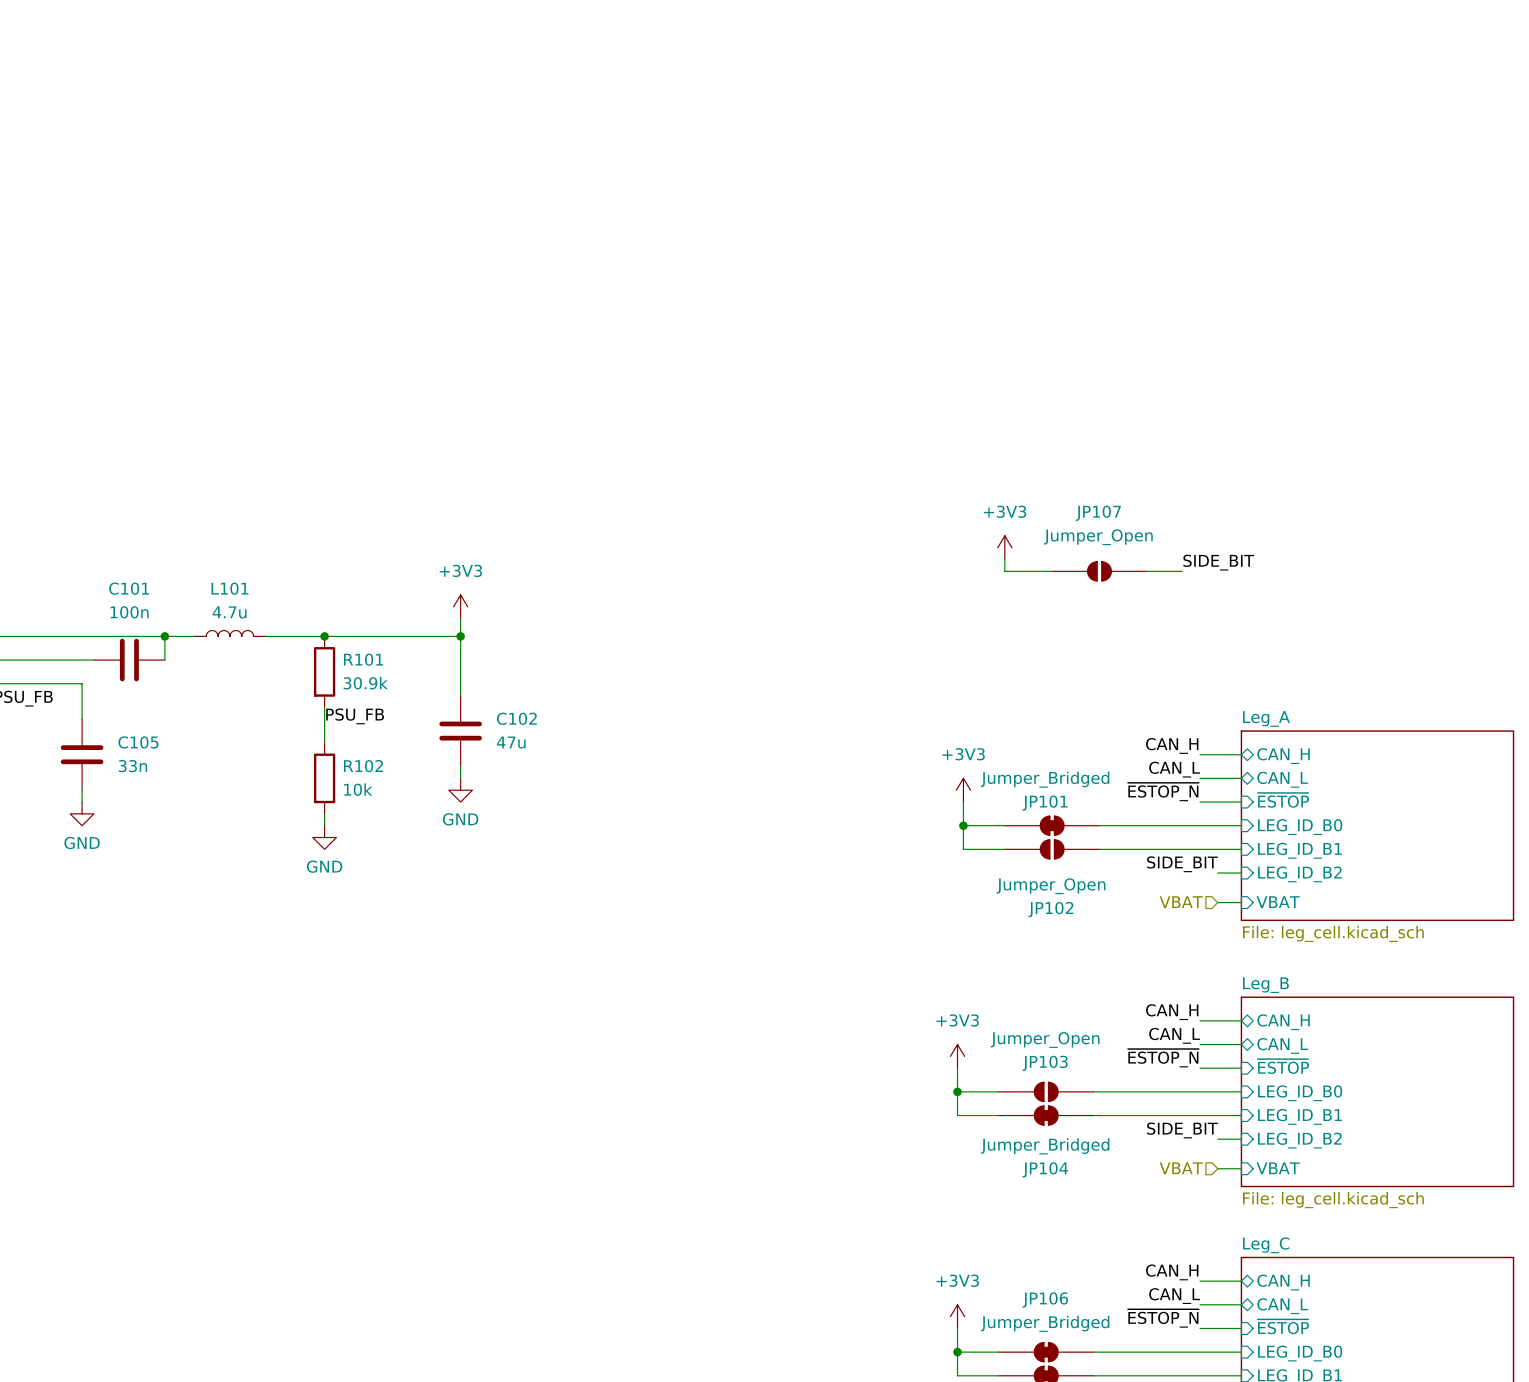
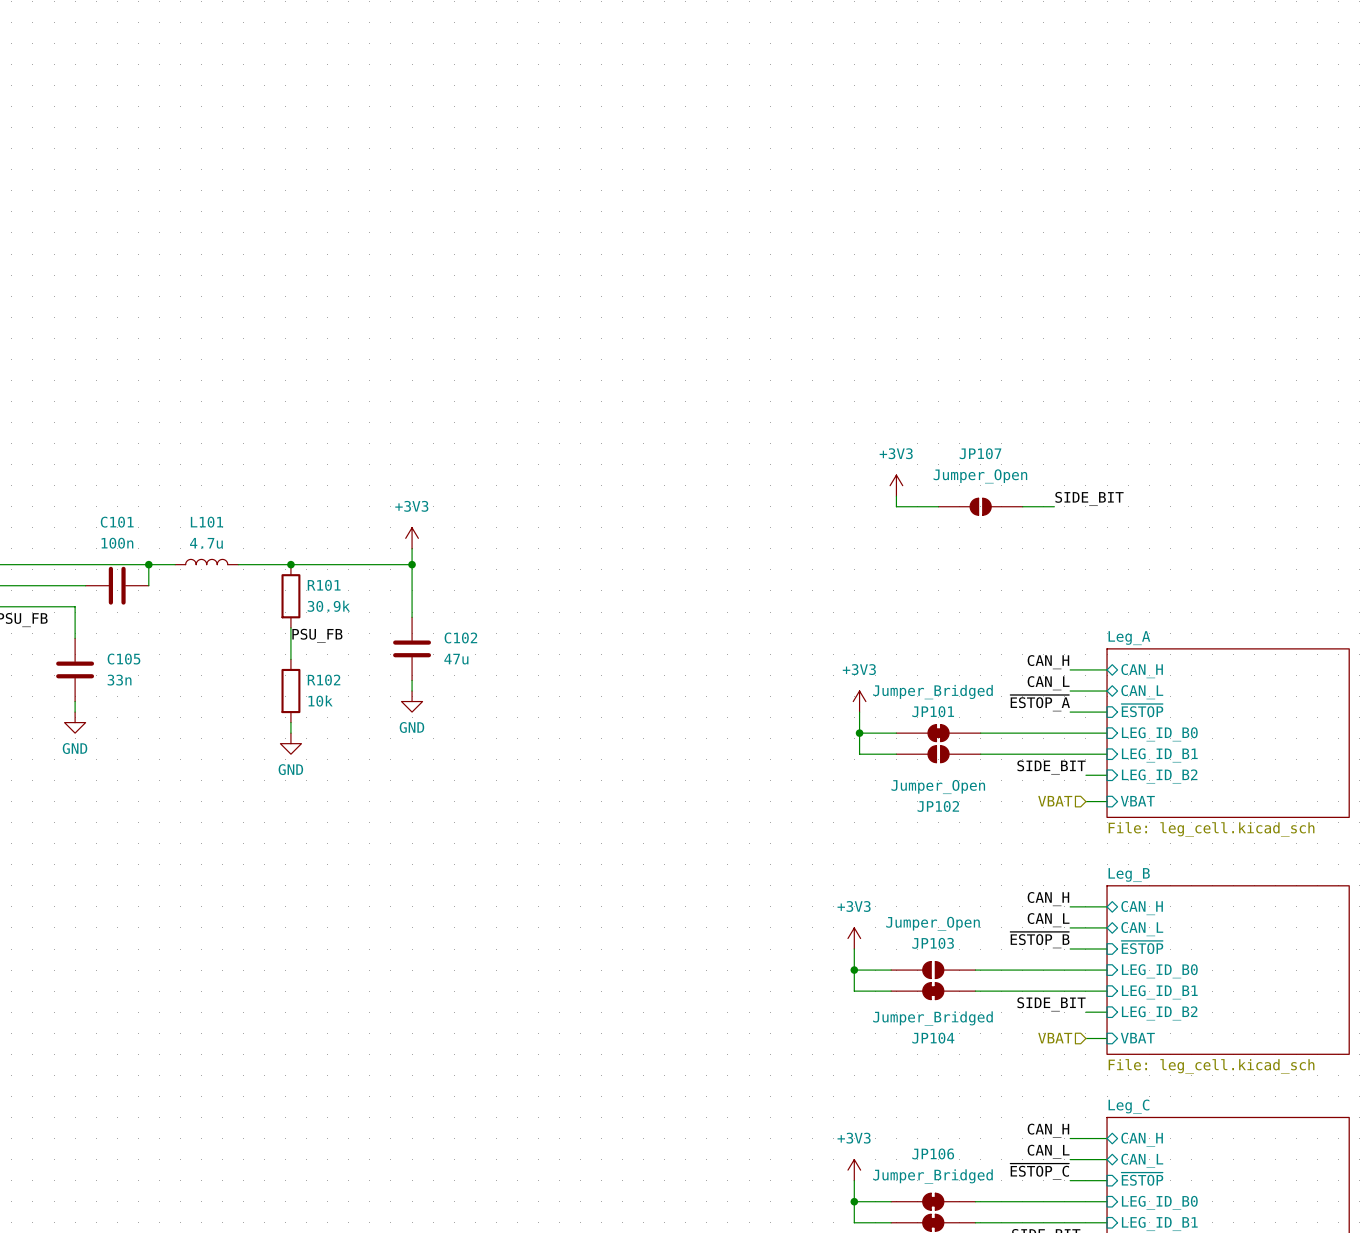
label: ~{ESTOP_N} (1163, 792) -> ~{ESTOP_A} (1040, 703)
label: ~{ESTOP_N} (1163, 1058) -> ~{ESTOP_B} (1039, 940)
label: ~{ESTOP_N} (1163, 1318) -> ~{ESTOP_C} (1039, 1171)

